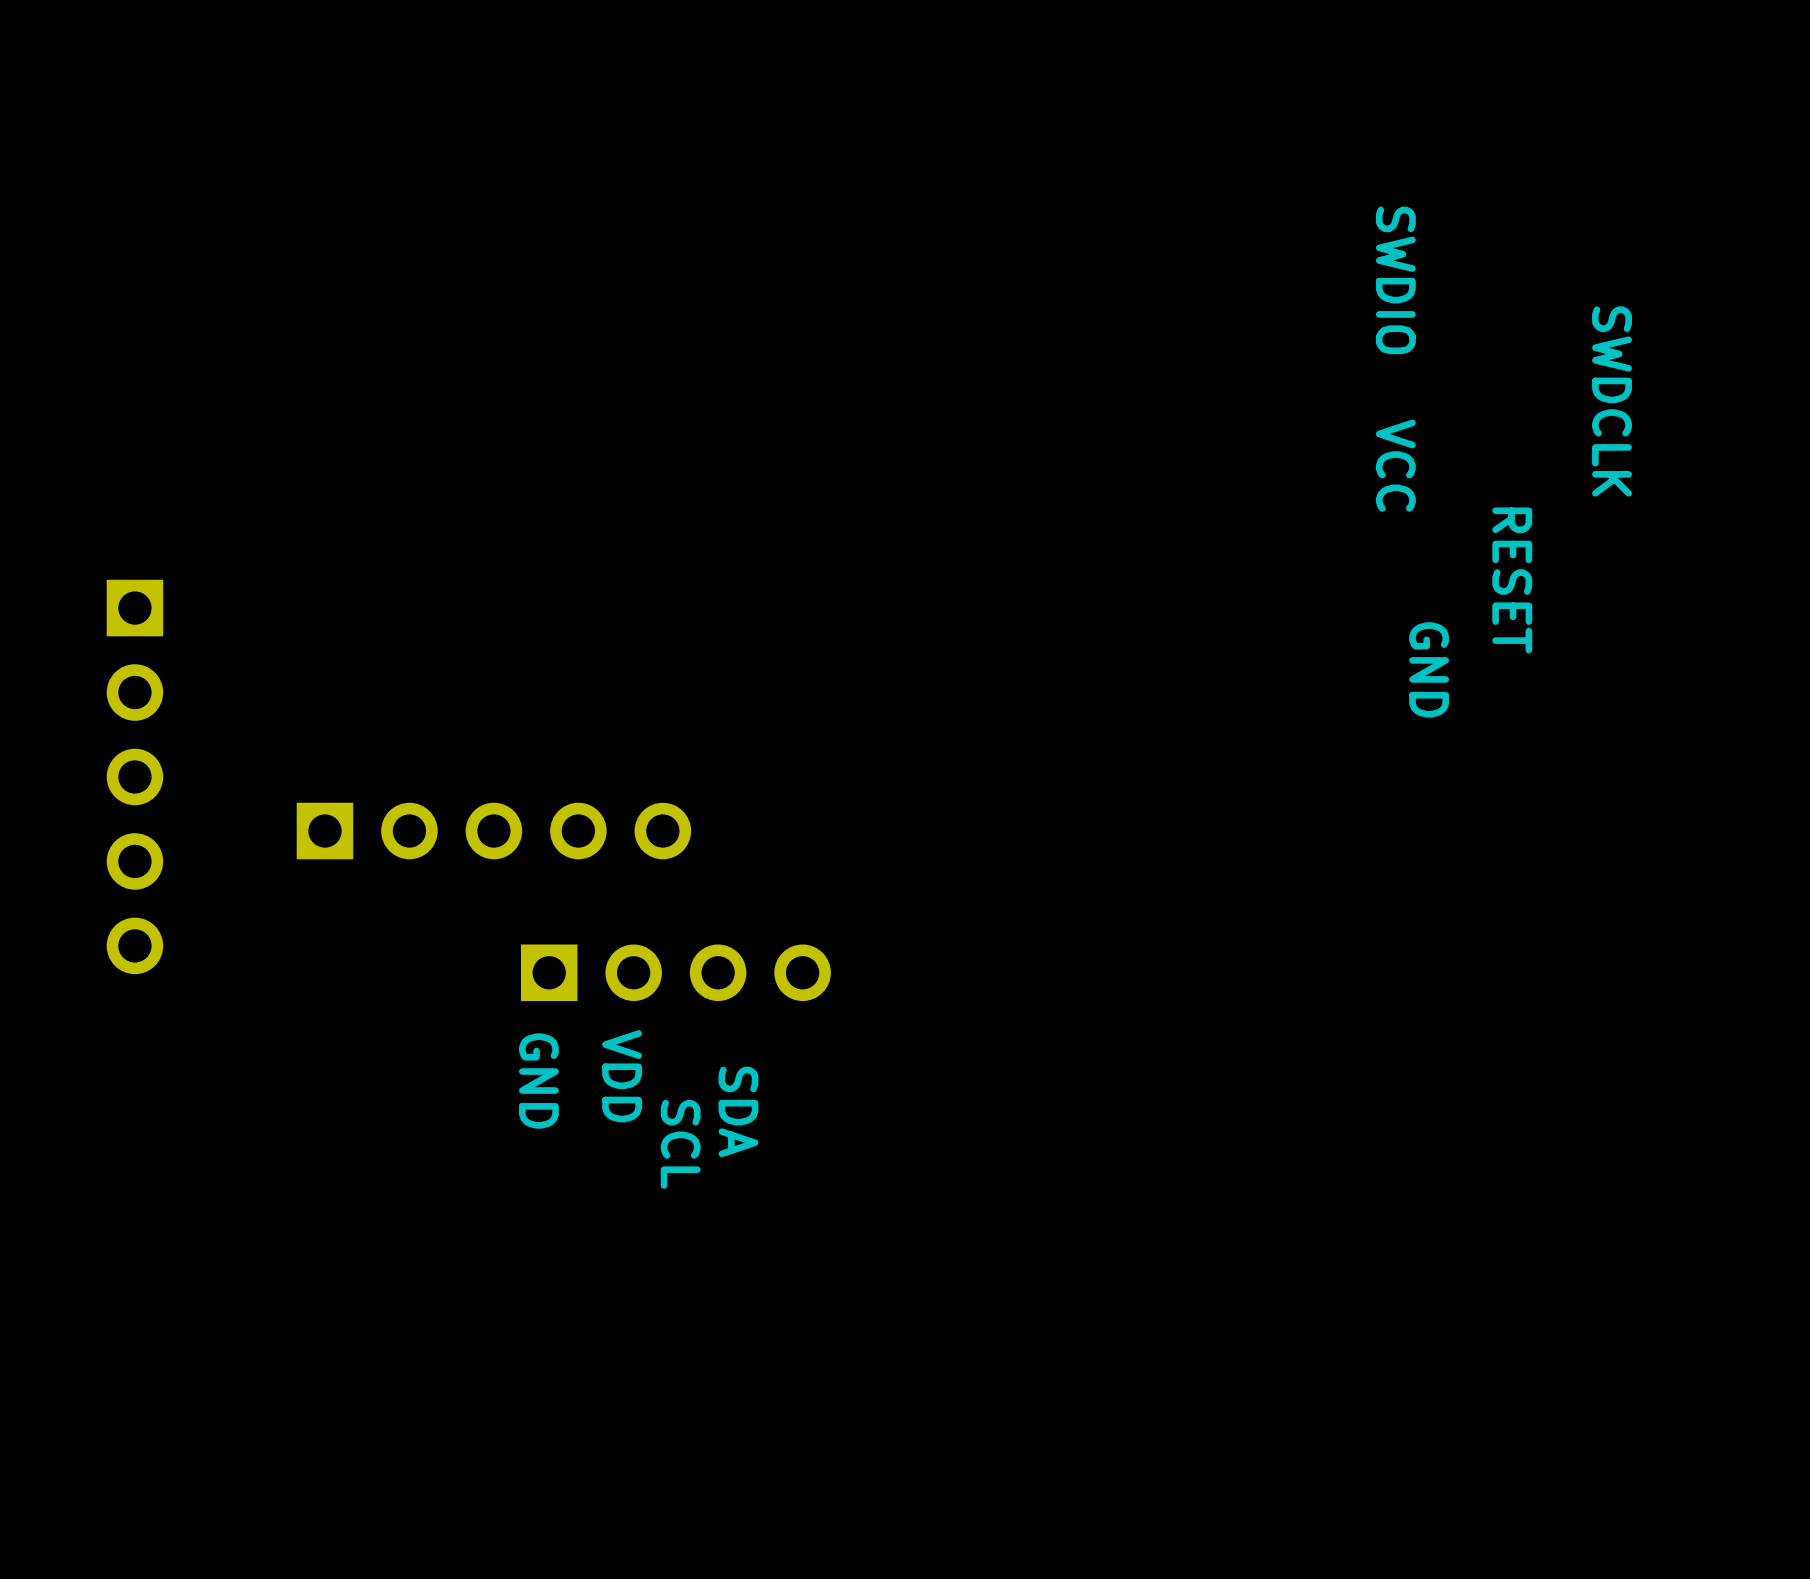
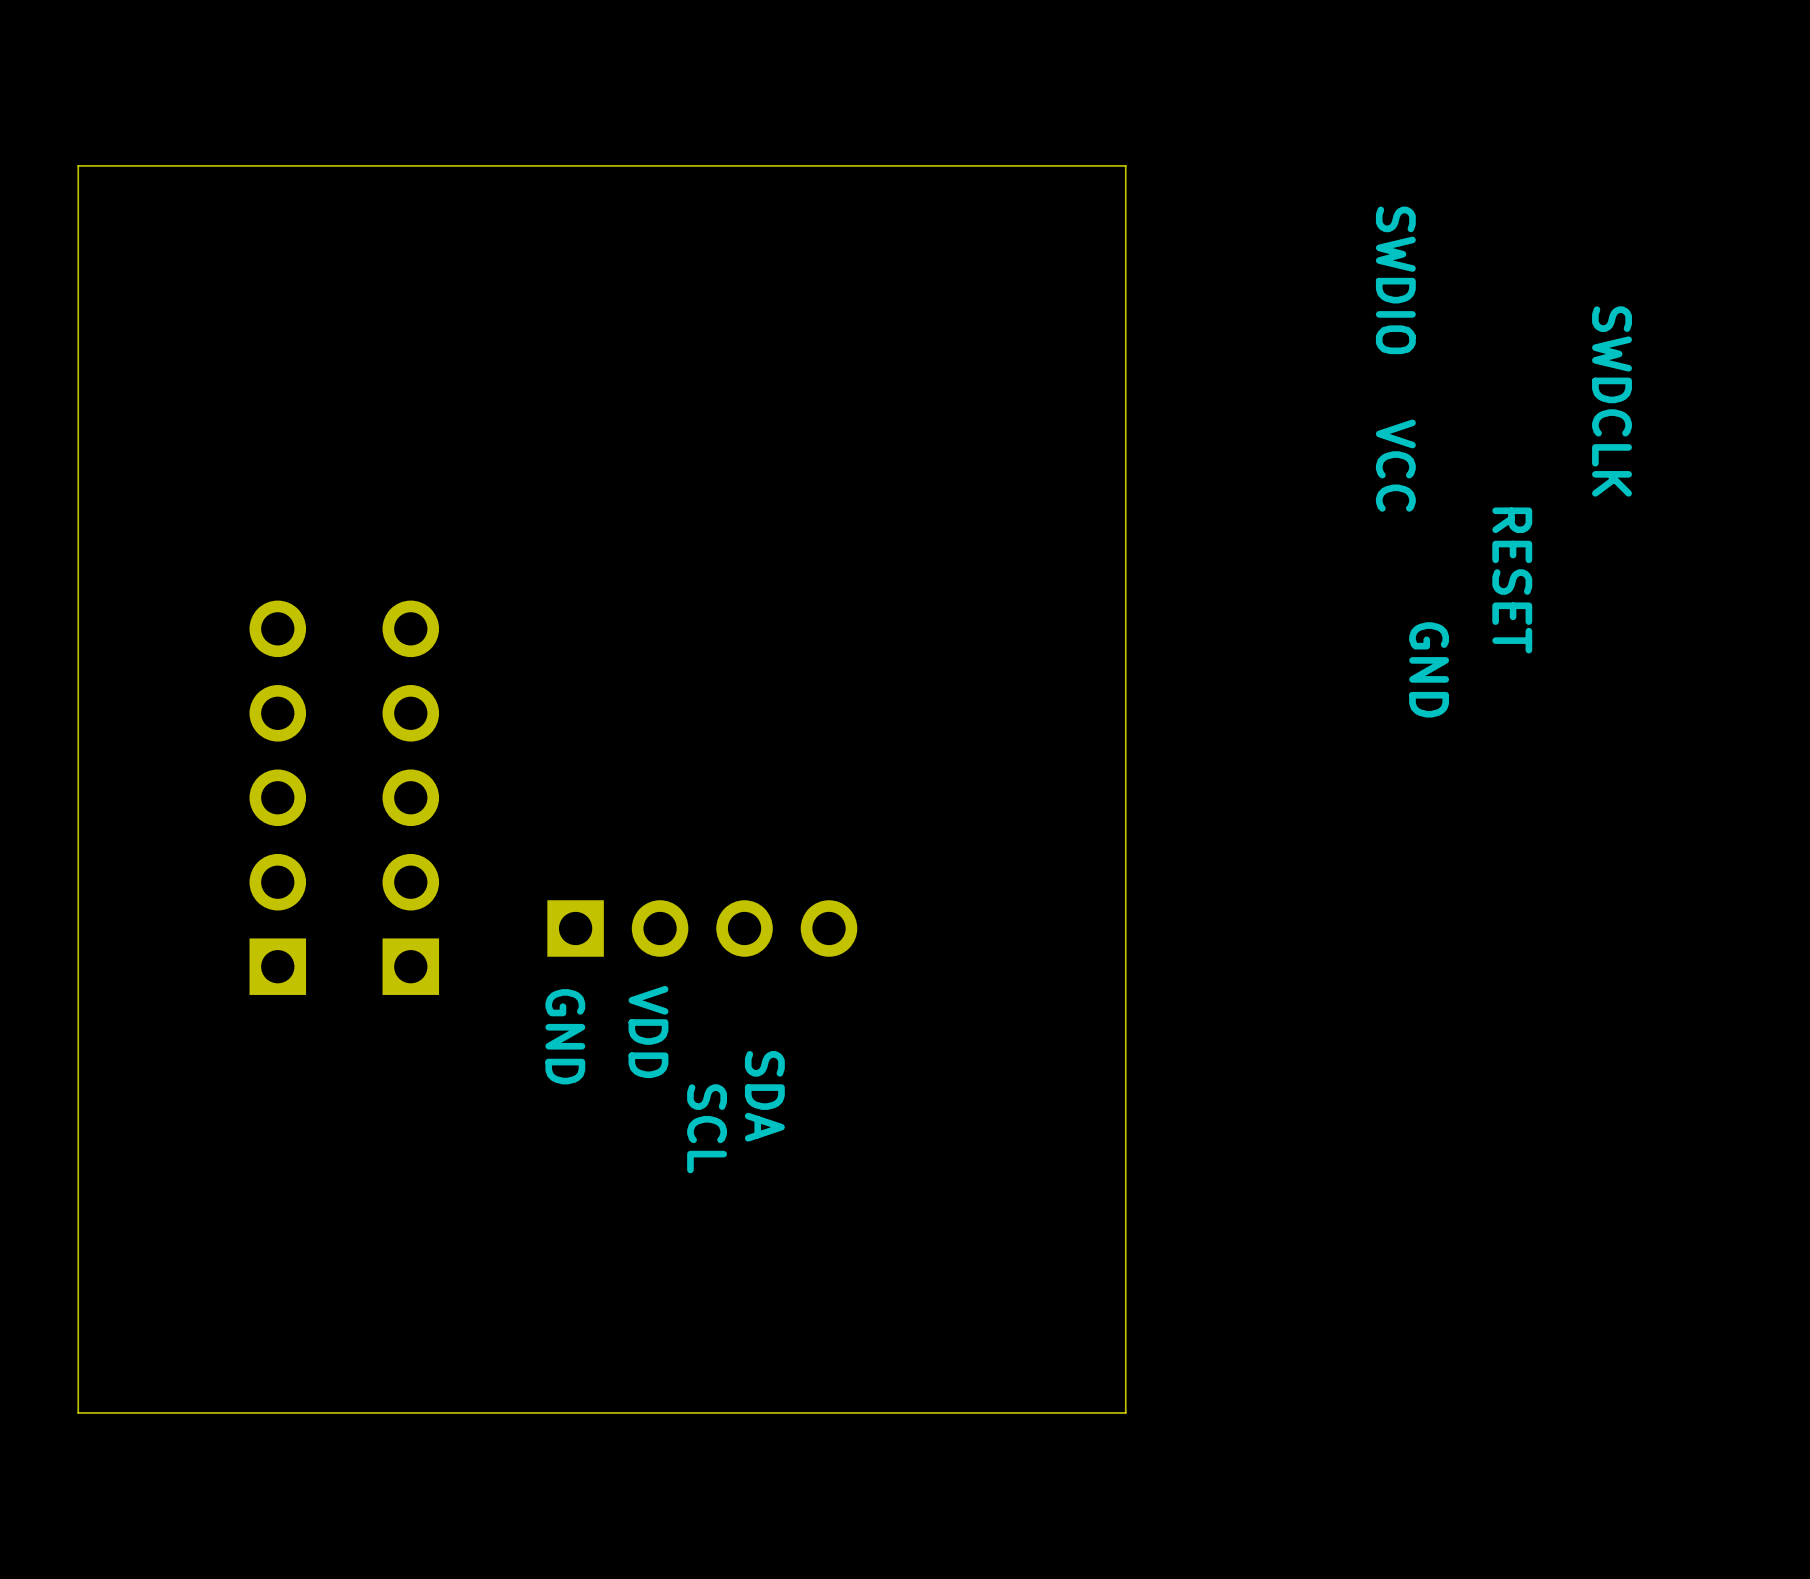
board edge: none -> (1125, 165) (78, 165) (78, 1412) (1125, 1412) (1125, 165)
part: (134, 776) -> none
part: none -> (277, 797)
part rotation: 0° (493, 831) -> 90° counterclockwise (410, 797)
part position: (675, 972) -> (702, 928)
text position: VDD (622, 1076) -> VDD (648, 1032)
text position: GND (538, 1081) -> GND (565, 1036)
text position: SDA (738, 1111) -> SDA (764, 1096)
text position: SCL (680, 1144) -> SCL (707, 1128)

